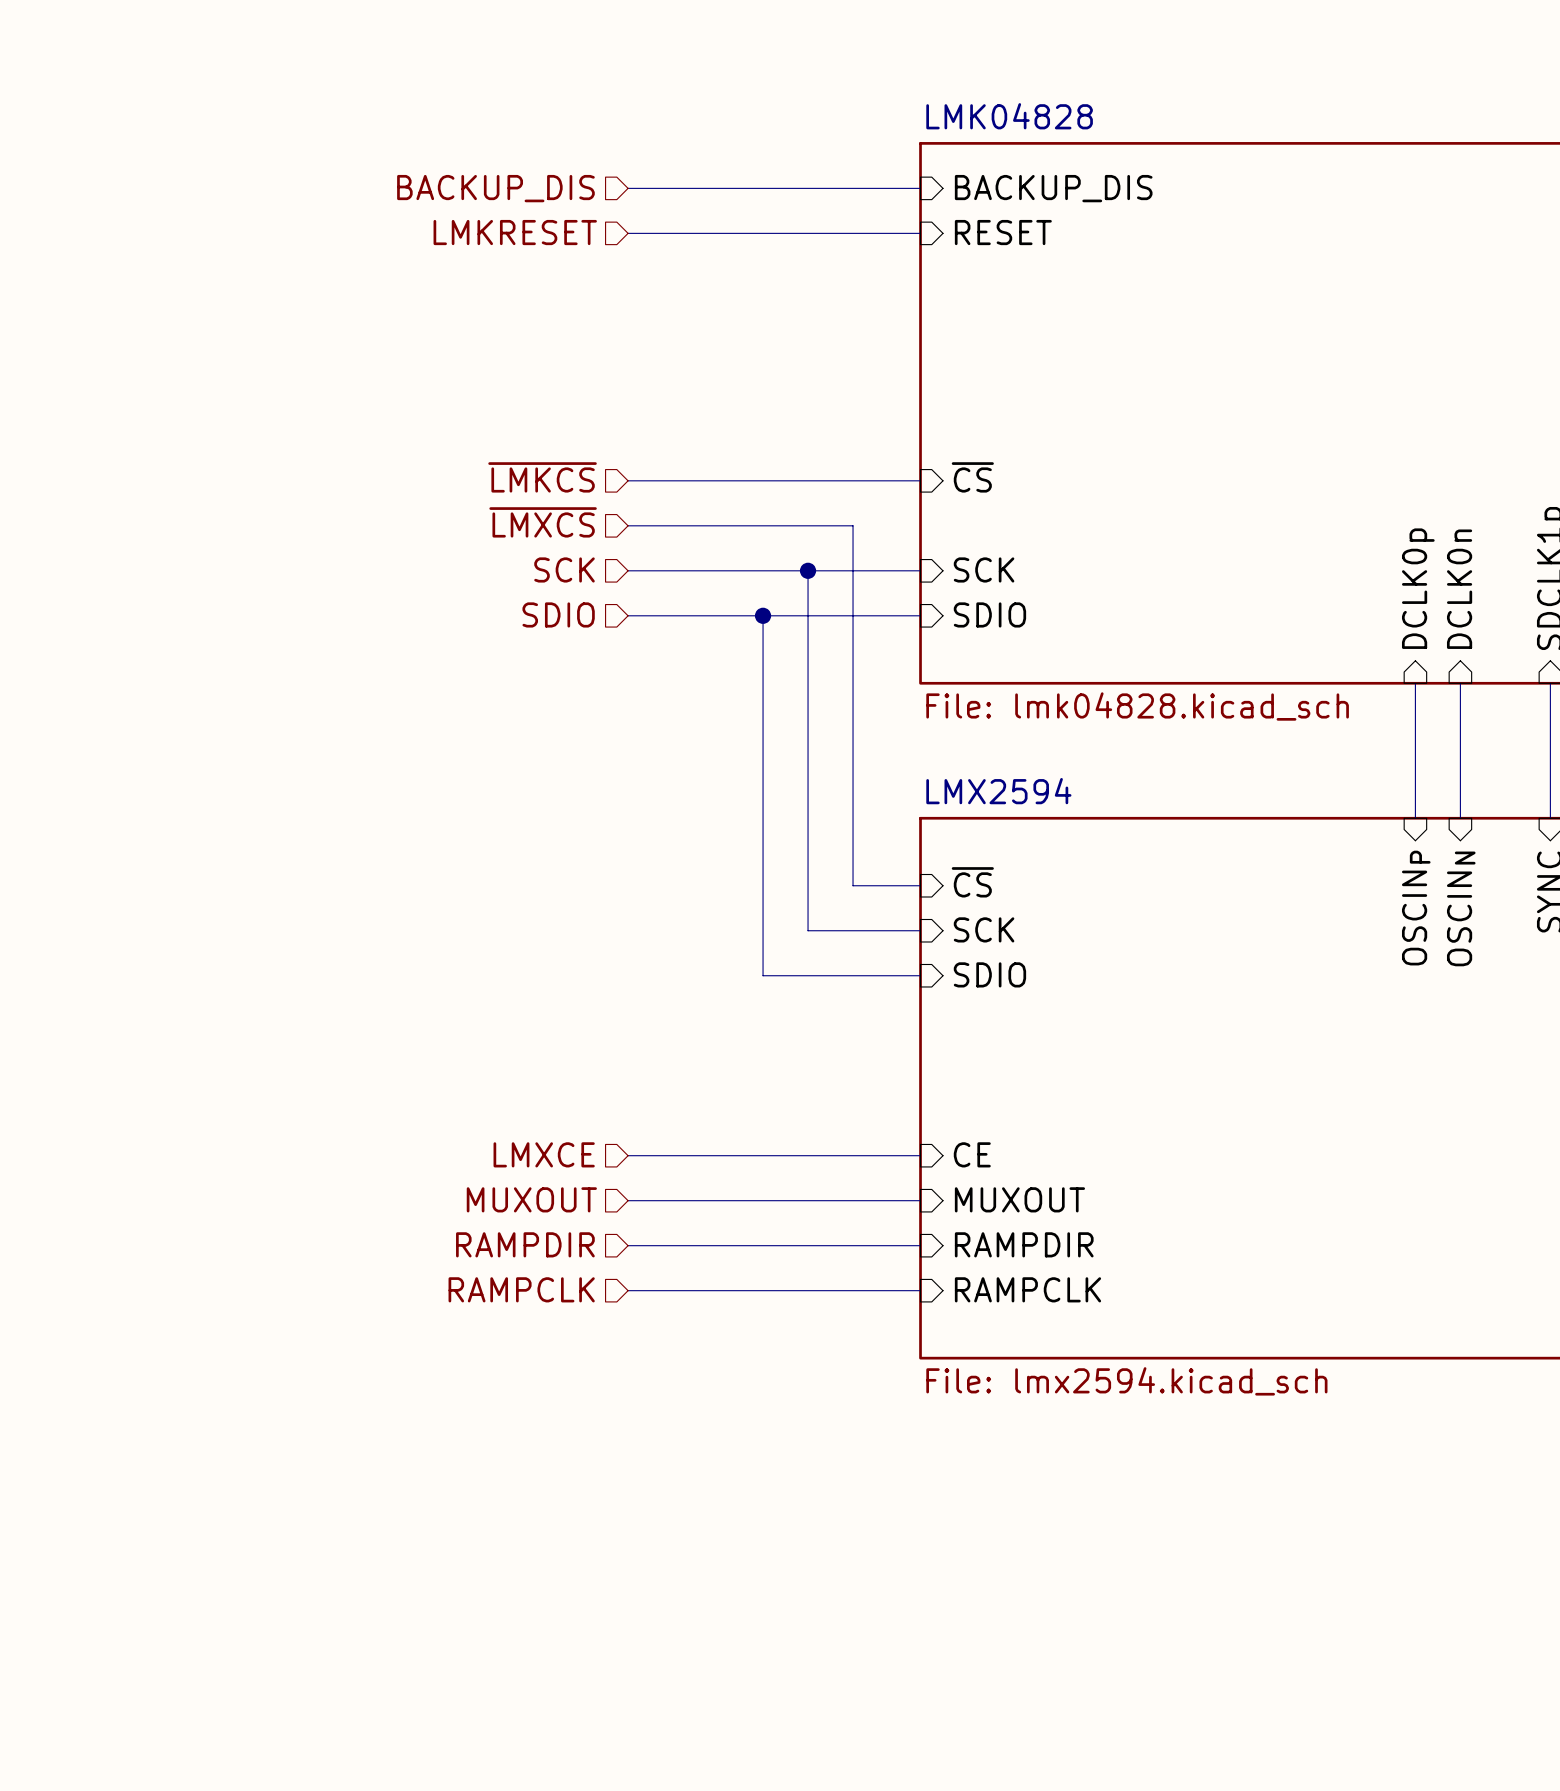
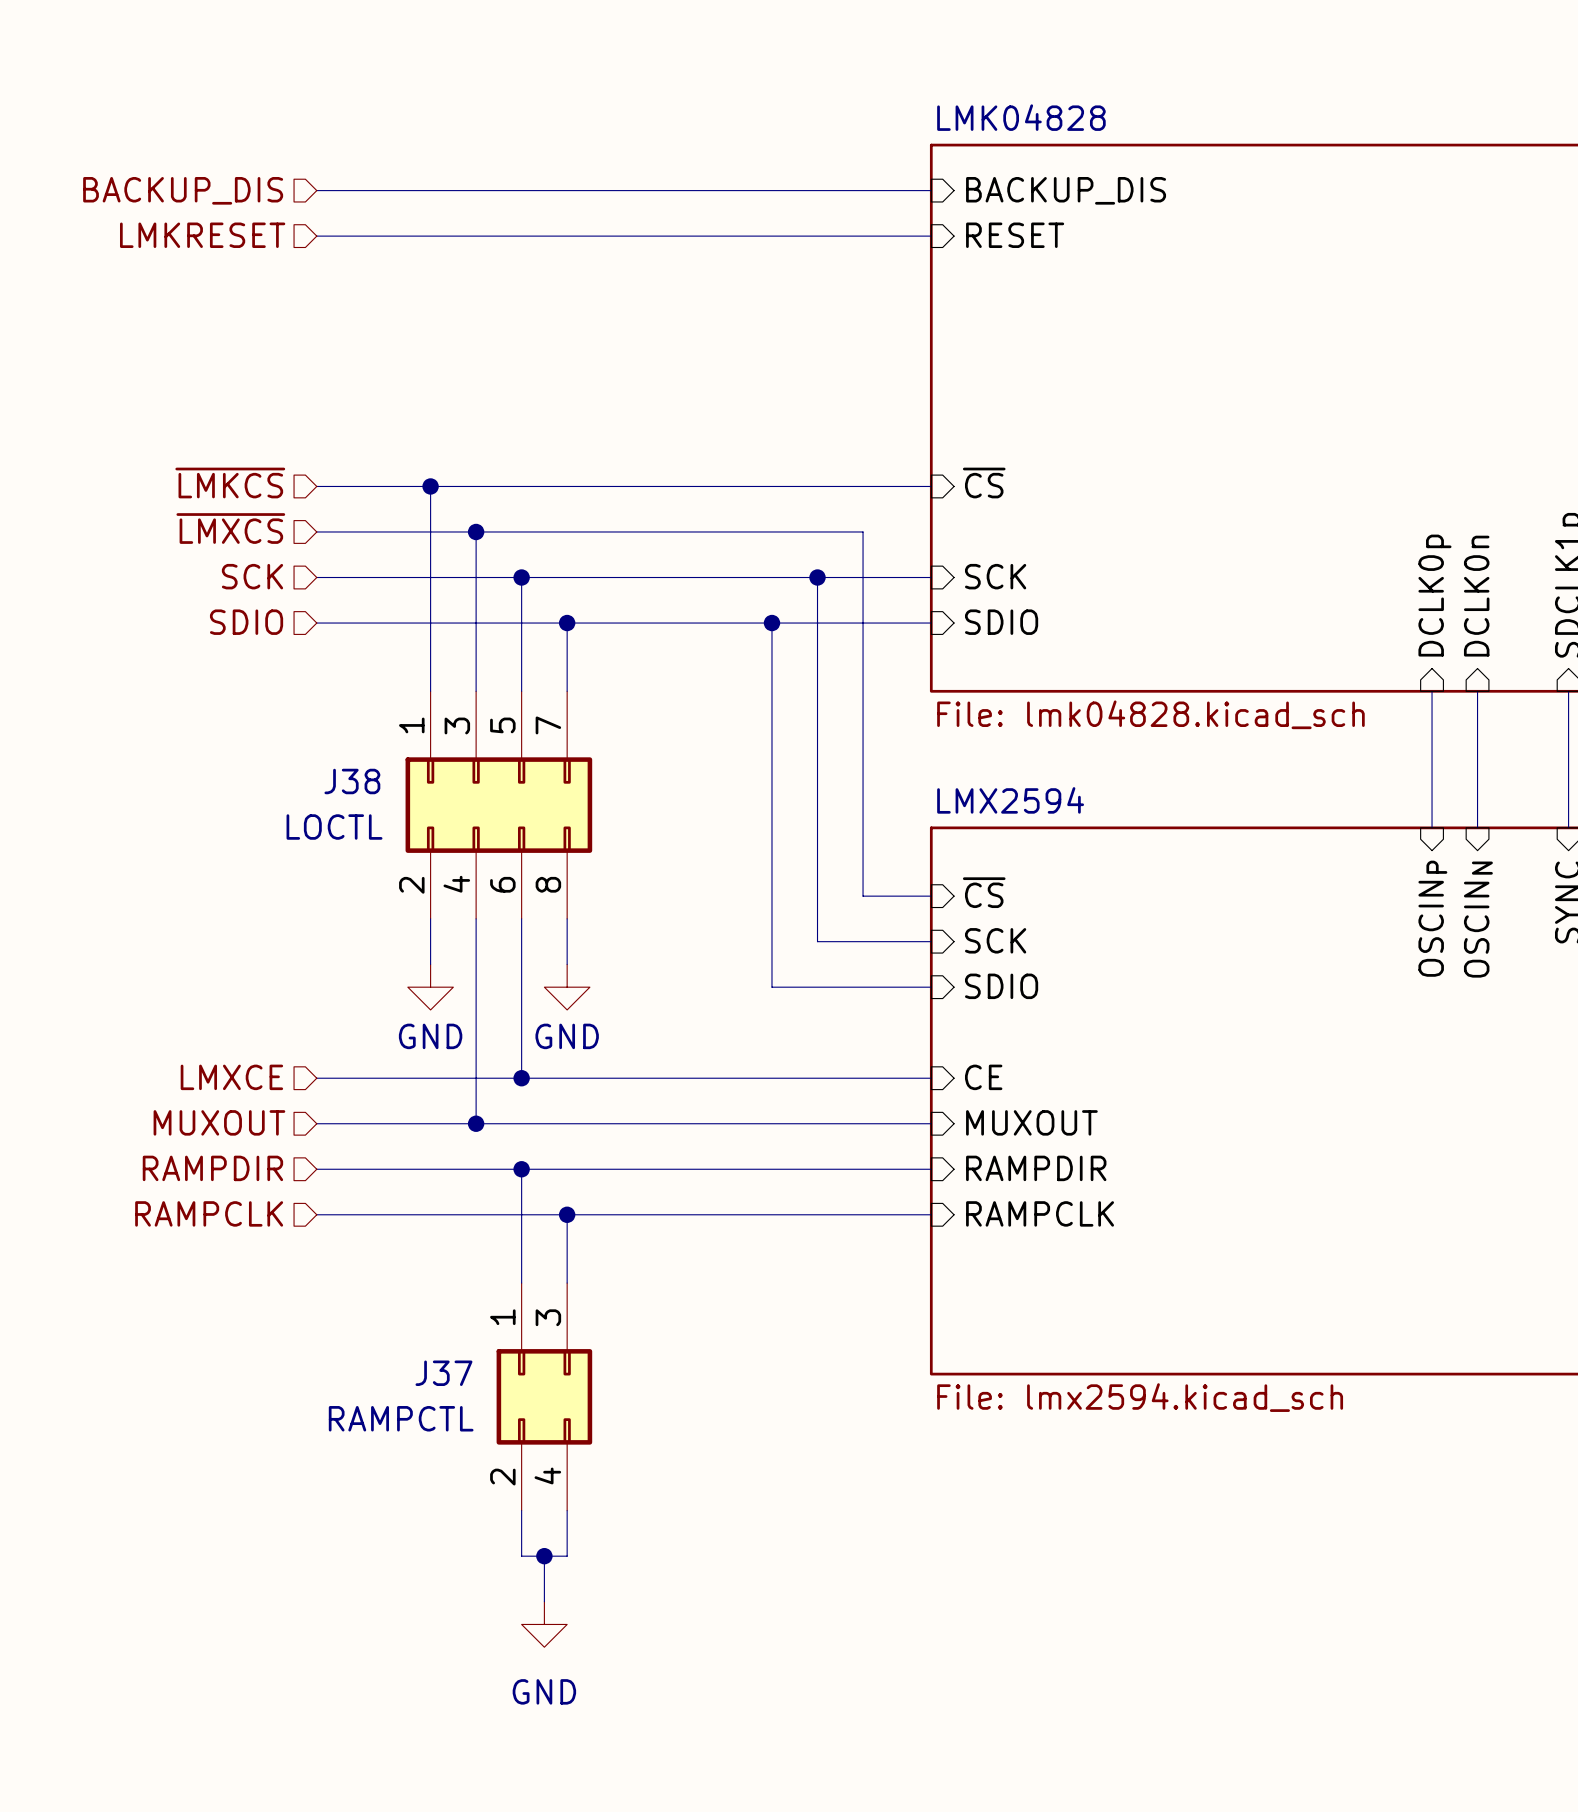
wire: none -> (316, 190) (635, 190)
hierarchical label position: BACKUP_DIS (495, 188) -> BACKUP_DIS (183, 190)
hierarchical label position: LMKRESET (515, 232) -> LMKRESET (202, 235)
wire: none -> (316, 236) (635, 236)
hierarchical label position: ~{LMKCS} (542, 477) -> ~{LMKCS} (230, 483)
wire: none -> (316, 486) (635, 486)
wire: none -> (430, 486) (430, 691)
junction: none -> (430, 486)
hierarchical label position: ~{LMXCS} (543, 522) -> ~{LMXCS} (230, 528)
wire: none -> (316, 531) (635, 531)
wire: none -> (476, 531) (476, 691)
junction: none -> (476, 531)
hierarchical label position: SCK (564, 569) -> SCK (252, 576)
wire: none -> (316, 577) (635, 577)
wire: none -> (521, 577) (521, 691)
junction: none -> (521, 577)
hierarchical label position: SDIO (558, 614) -> SDIO (246, 622)
wire: none -> (316, 623) (635, 623)
wire: none -> (567, 623) (567, 691)
junction: none -> (567, 623)
J38: none -> LOCTL (498, 805)
wire: none -> (430, 918) (430, 964)
wire: none -> (476, 918) (476, 1123)
wire: none -> (521, 918) (521, 1078)
wire: none -> (567, 918) (567, 964)
power symbol: none -> GND (430, 987)
power symbol: none -> GND (567, 987)
sheet pin: none -> CE (983, 1077)
wire: none -> (316, 1078) (931, 1078)
junction: none -> (521, 1078)
sheet pin: none -> MUXOUT (1031, 1122)
wire: none -> (316, 1123) (931, 1123)
junction: none -> (476, 1123)
hierarchical label position: LMXCE (544, 1154) -> LMXCE (231, 1077)
sheet pin: CE (972, 1154) -> RAMPDIR (1036, 1168)
wire: none -> (316, 1169) (635, 1169)
wire: none -> (521, 1169) (521, 1283)
junction: none -> (521, 1169)
hierarchical label position: MUXOUT (531, 1199) -> MUXOUT (219, 1122)
sheet pin: MUXOUT (1019, 1199) -> RAMPCLK (1040, 1213)
wire: none -> (316, 1214) (635, 1214)
wire: none -> (567, 1214) (567, 1283)
junction: none -> (567, 1214)
hierarchical label position: RAMPDIR (525, 1244) -> RAMPDIR (212, 1168)
sheet pin: RAMPDIR (1024, 1244) -> none
wire: (628, 1245) (920, 1245) -> none
hierarchical label position: RAMPCLK (521, 1289) -> RAMPCLK (209, 1213)
sheet pin: RAMPCLK (1027, 1289) -> none
wire: (628, 1290) (920, 1290) -> none
J37: none -> RAMPCTL (544, 1396)
wire: none -> (521, 1510) (521, 1556) (567, 1556) (567, 1510)
wire: none -> (544, 1556) (544, 1601)
junction: none -> (544, 1556)
power symbol: none -> GND (544, 1624)

